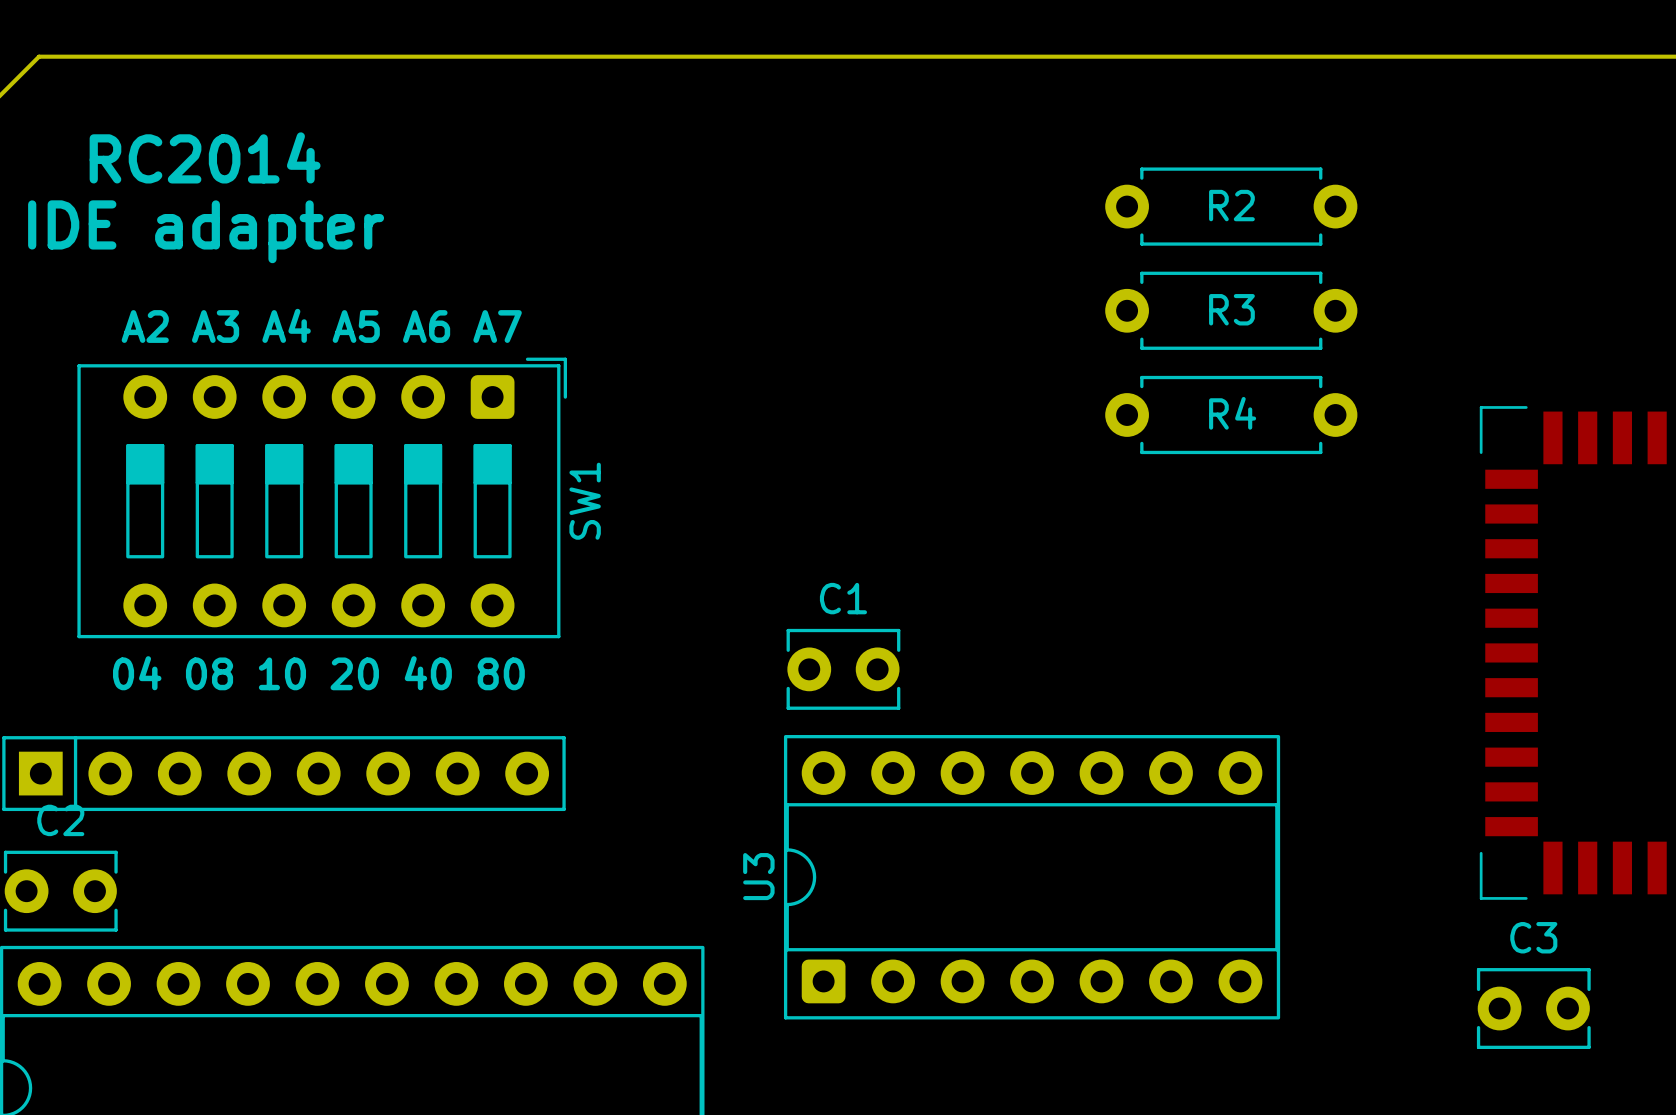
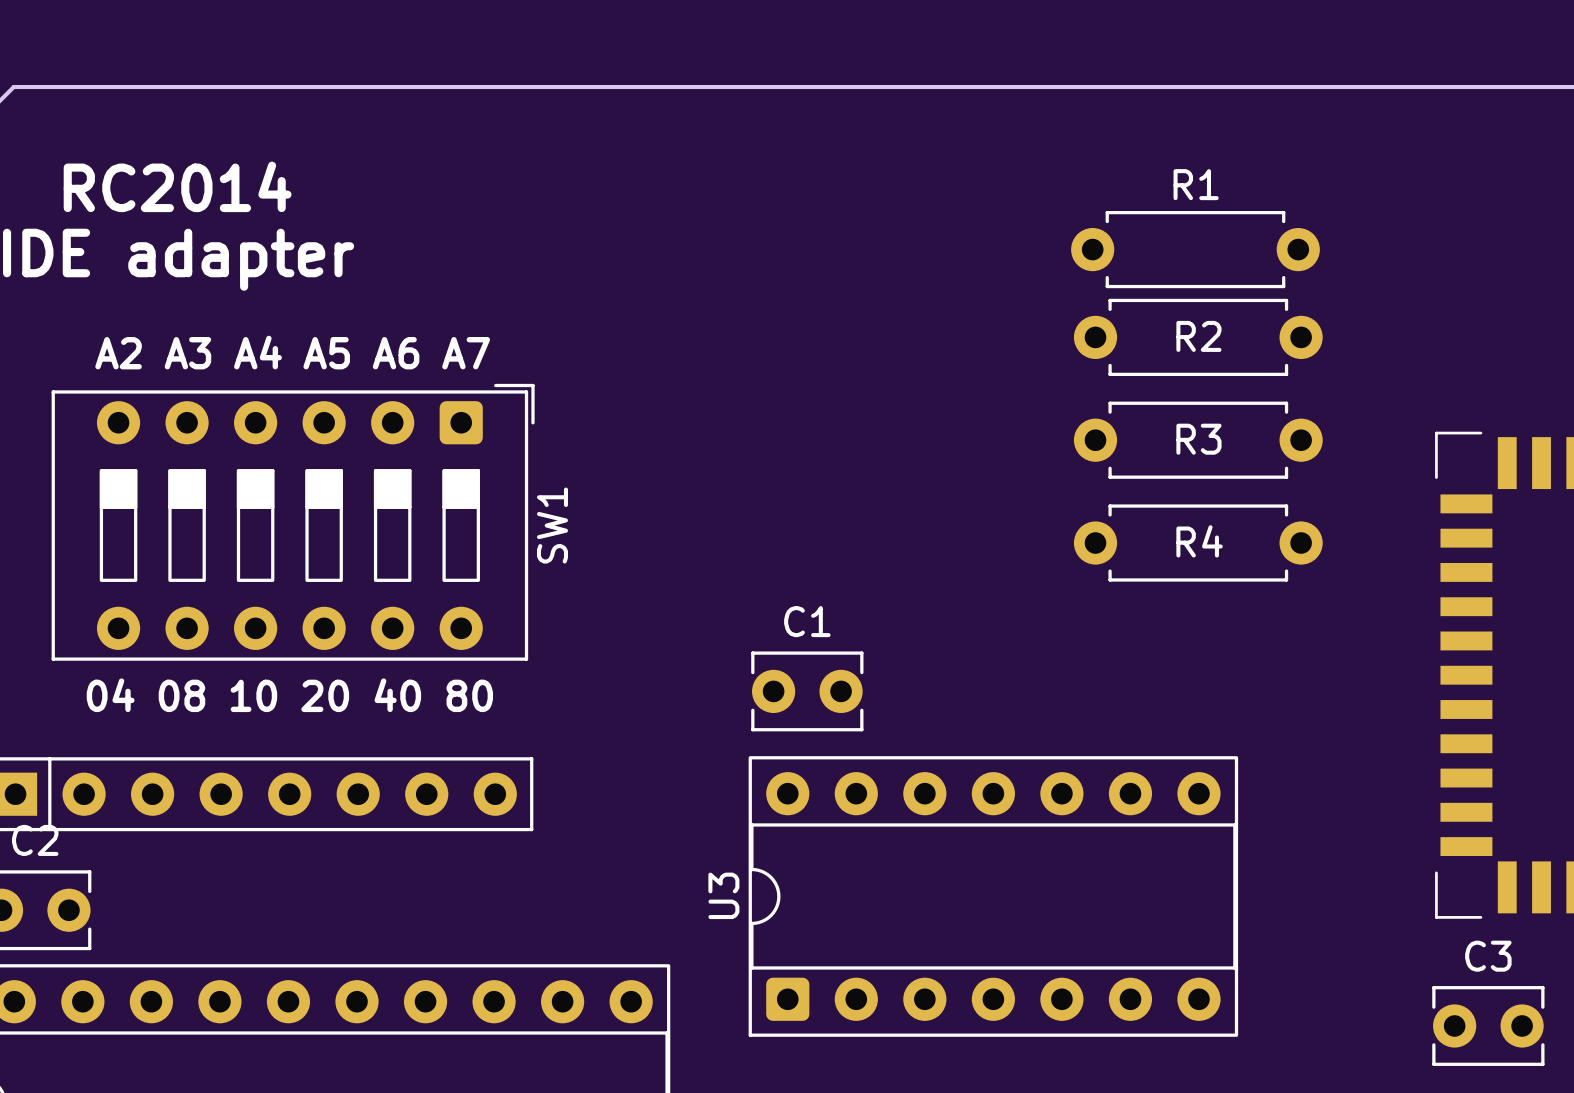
R2 position: (1231, 206) -> (1198, 337)
R1: none -> (1195, 249)
R3 position: (1231, 310) -> (1198, 440)
R4 position: (1231, 414) -> (1198, 543)

